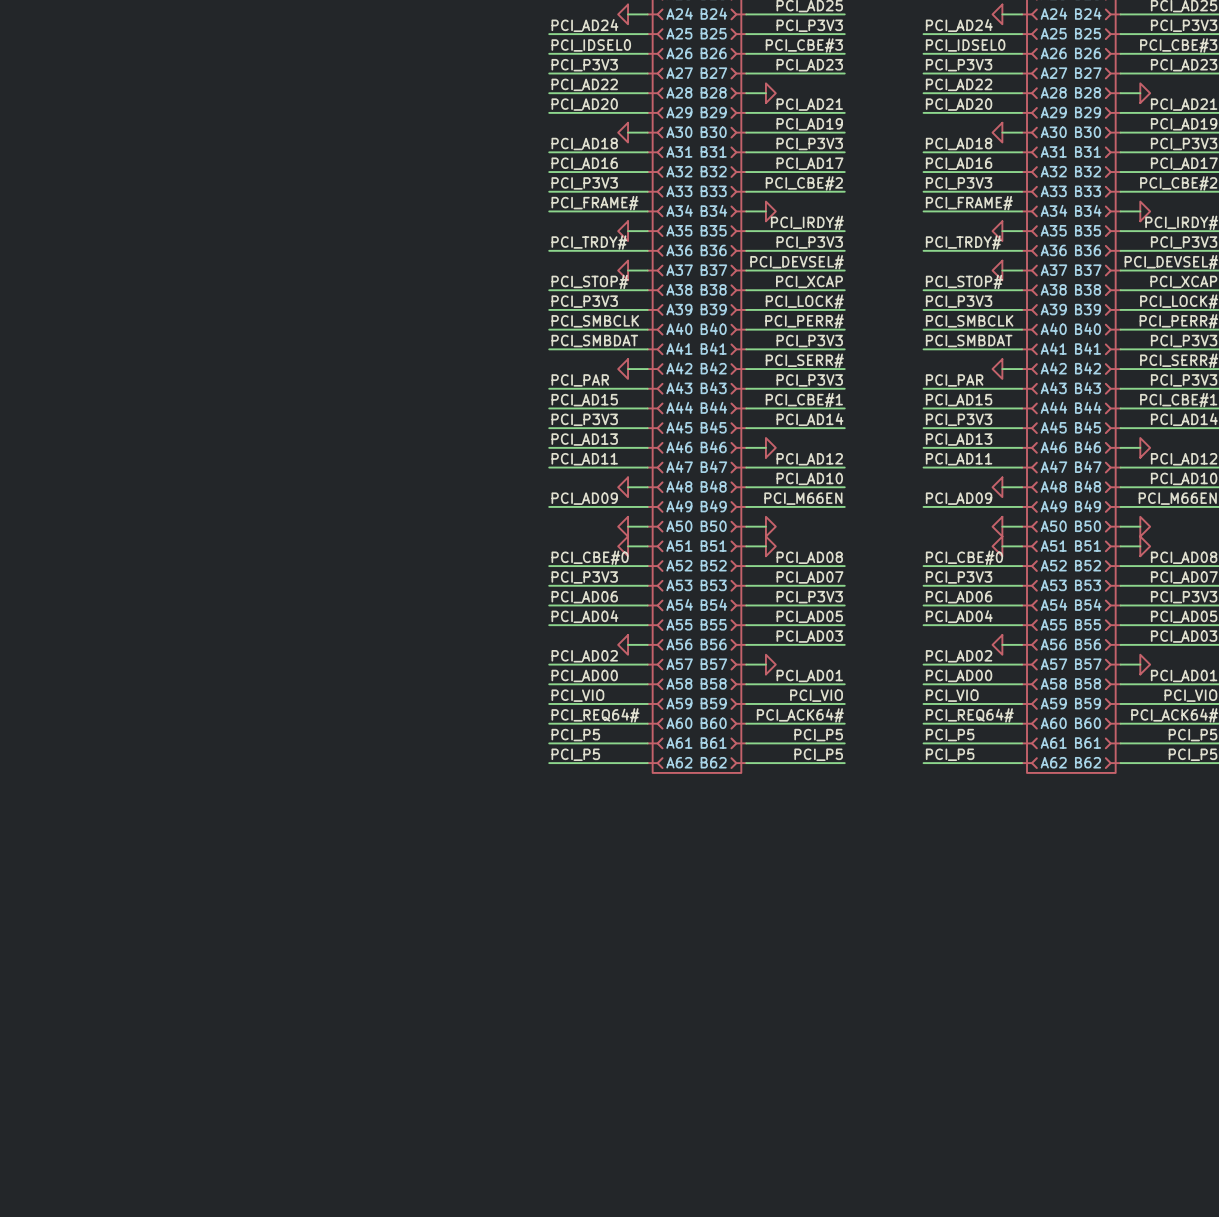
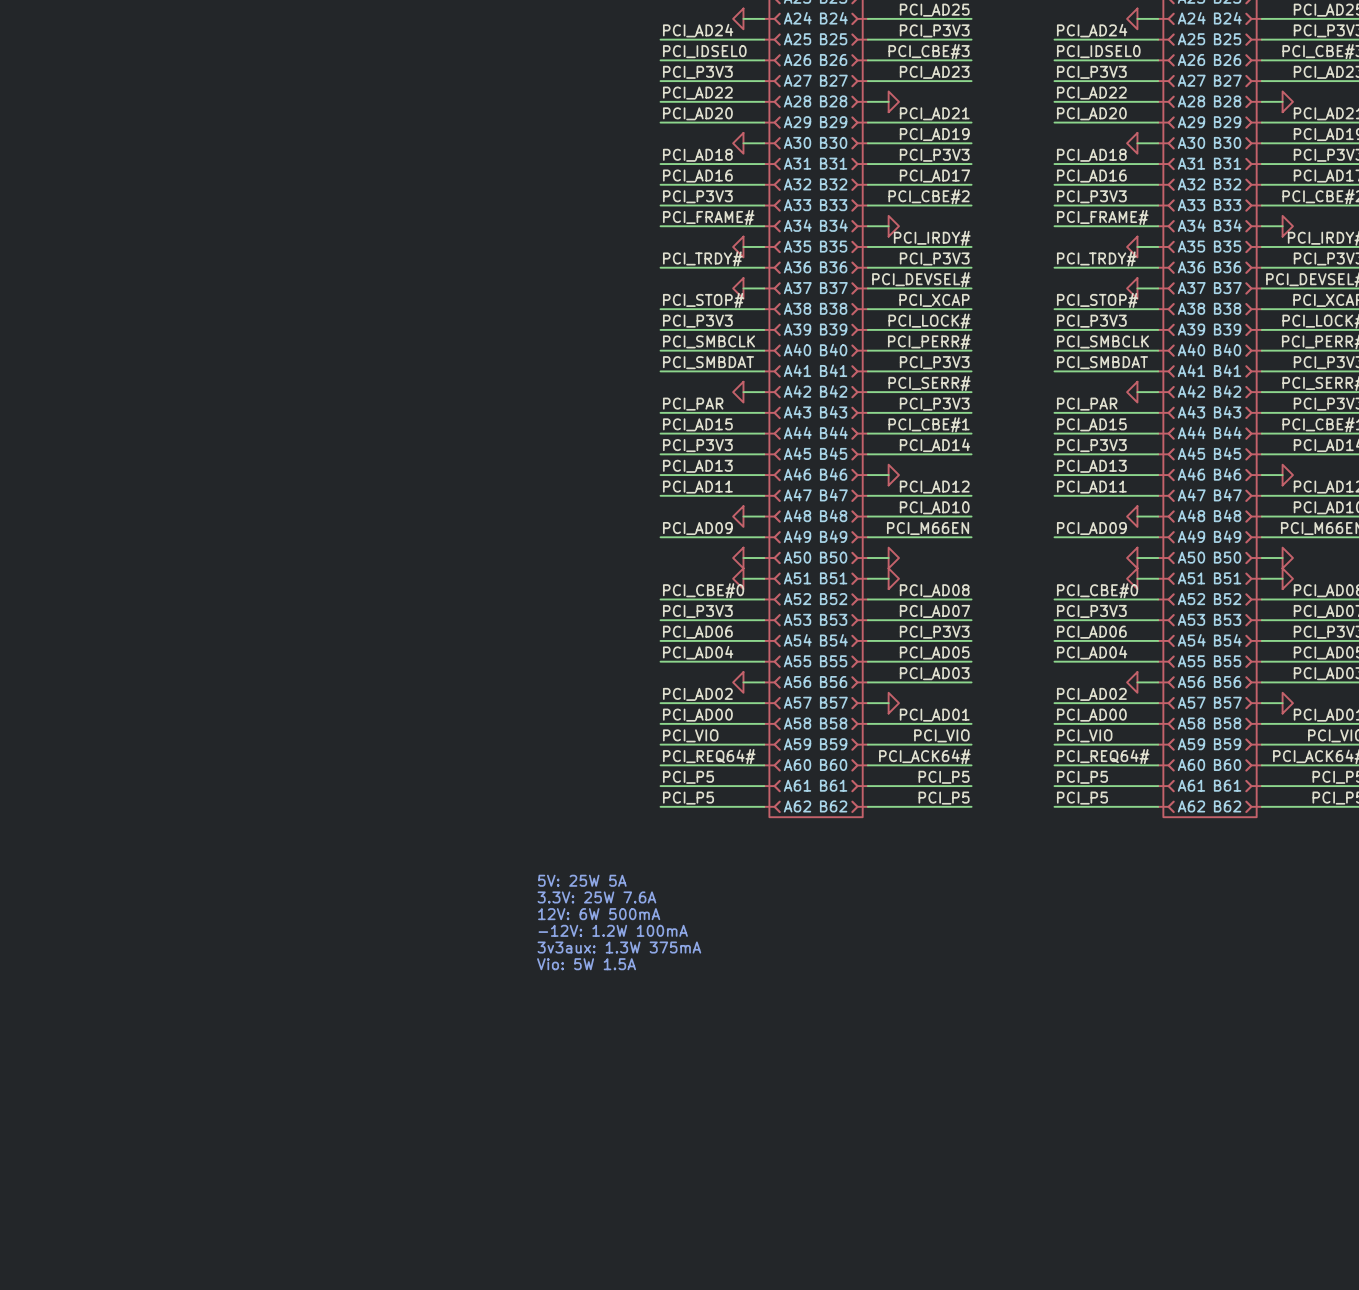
text: none -> 5V: 25W 5A (582, 880)
text: none -> 3.3V: 25W 7.6A (596, 897)
text: none -> 12V: 6W 500mA (599, 914)
text: none -> -12V: 1.2W 100mA (613, 930)
text: none -> 3v3aux: 1.3W 375mA (619, 947)
text: none -> Vio: 5W 1.5A (586, 964)

